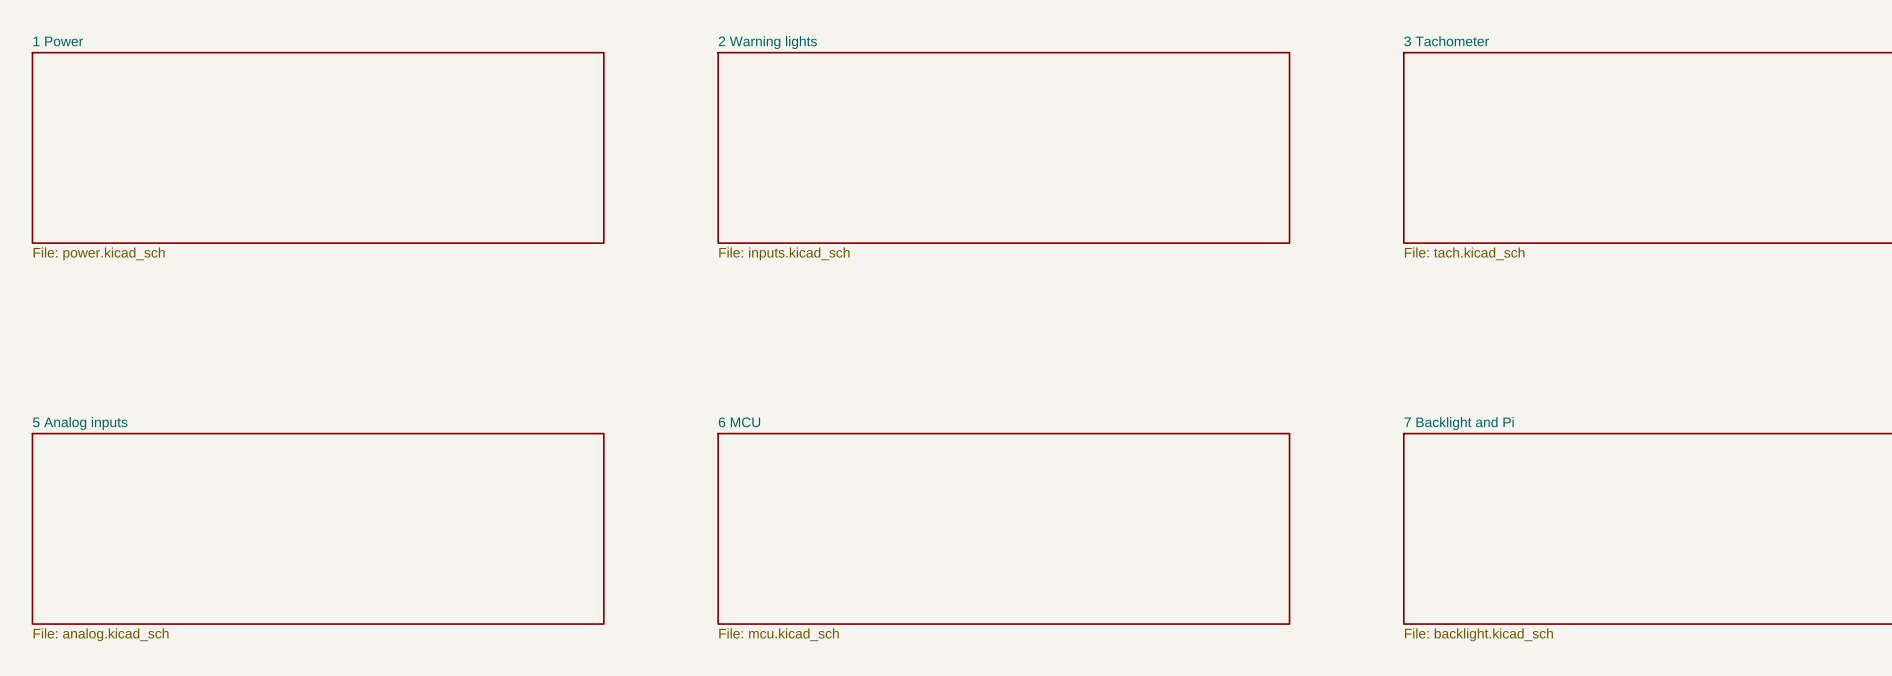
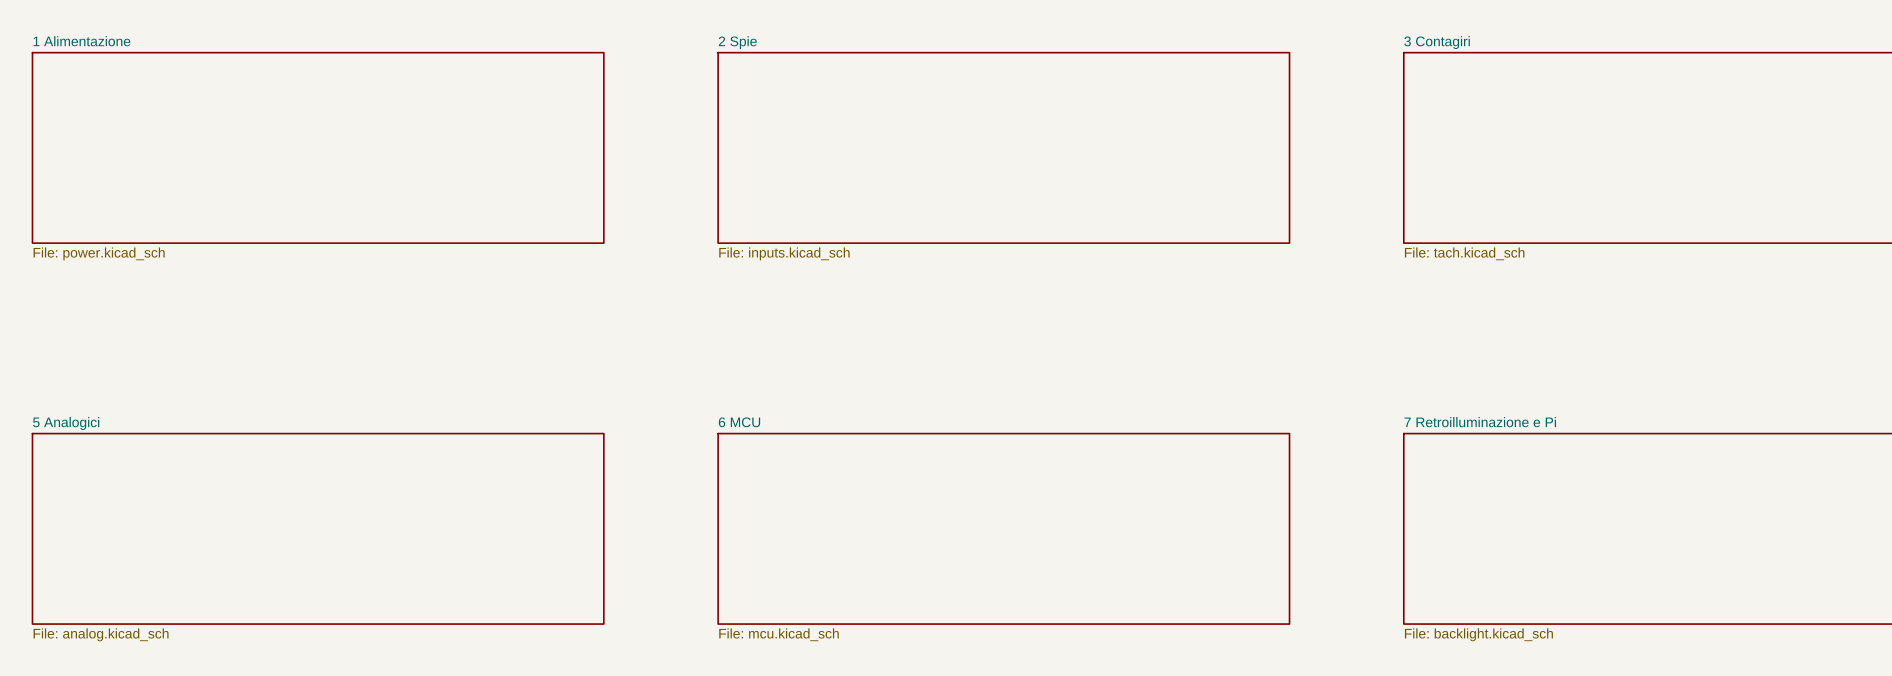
sheet 1 Power name: 1 Power (58, 41) -> 1 Alimentazione (81, 41)
sheet 3 Tachometer name: 3 Tachometer (1446, 41) -> 3 Contagiri (1437, 42)
sheet 2 Warning lights name: 2 Warning lights (767, 42) -> 2 Spie (737, 42)
sheet 5 Analog inputs name: 5 Analog inputs (80, 423) -> 5 Analogici (66, 423)
sheet 7 Backlight and Pi name: 7 Backlight and Pi (1459, 423) -> 7 Retroilluminazione e Pi (1480, 422)

